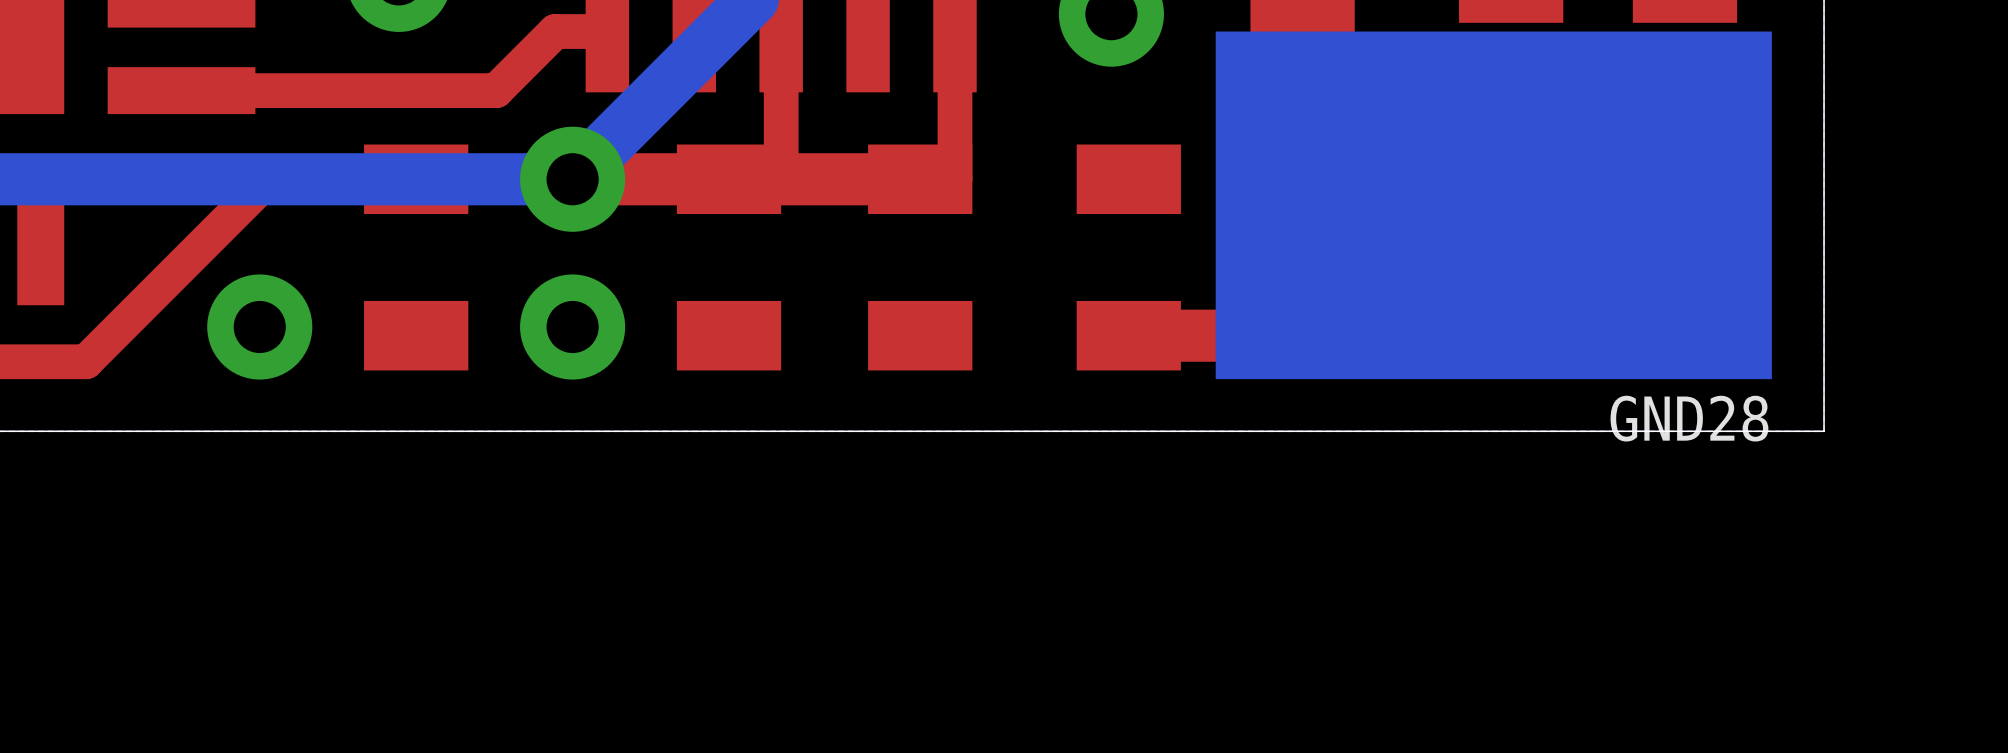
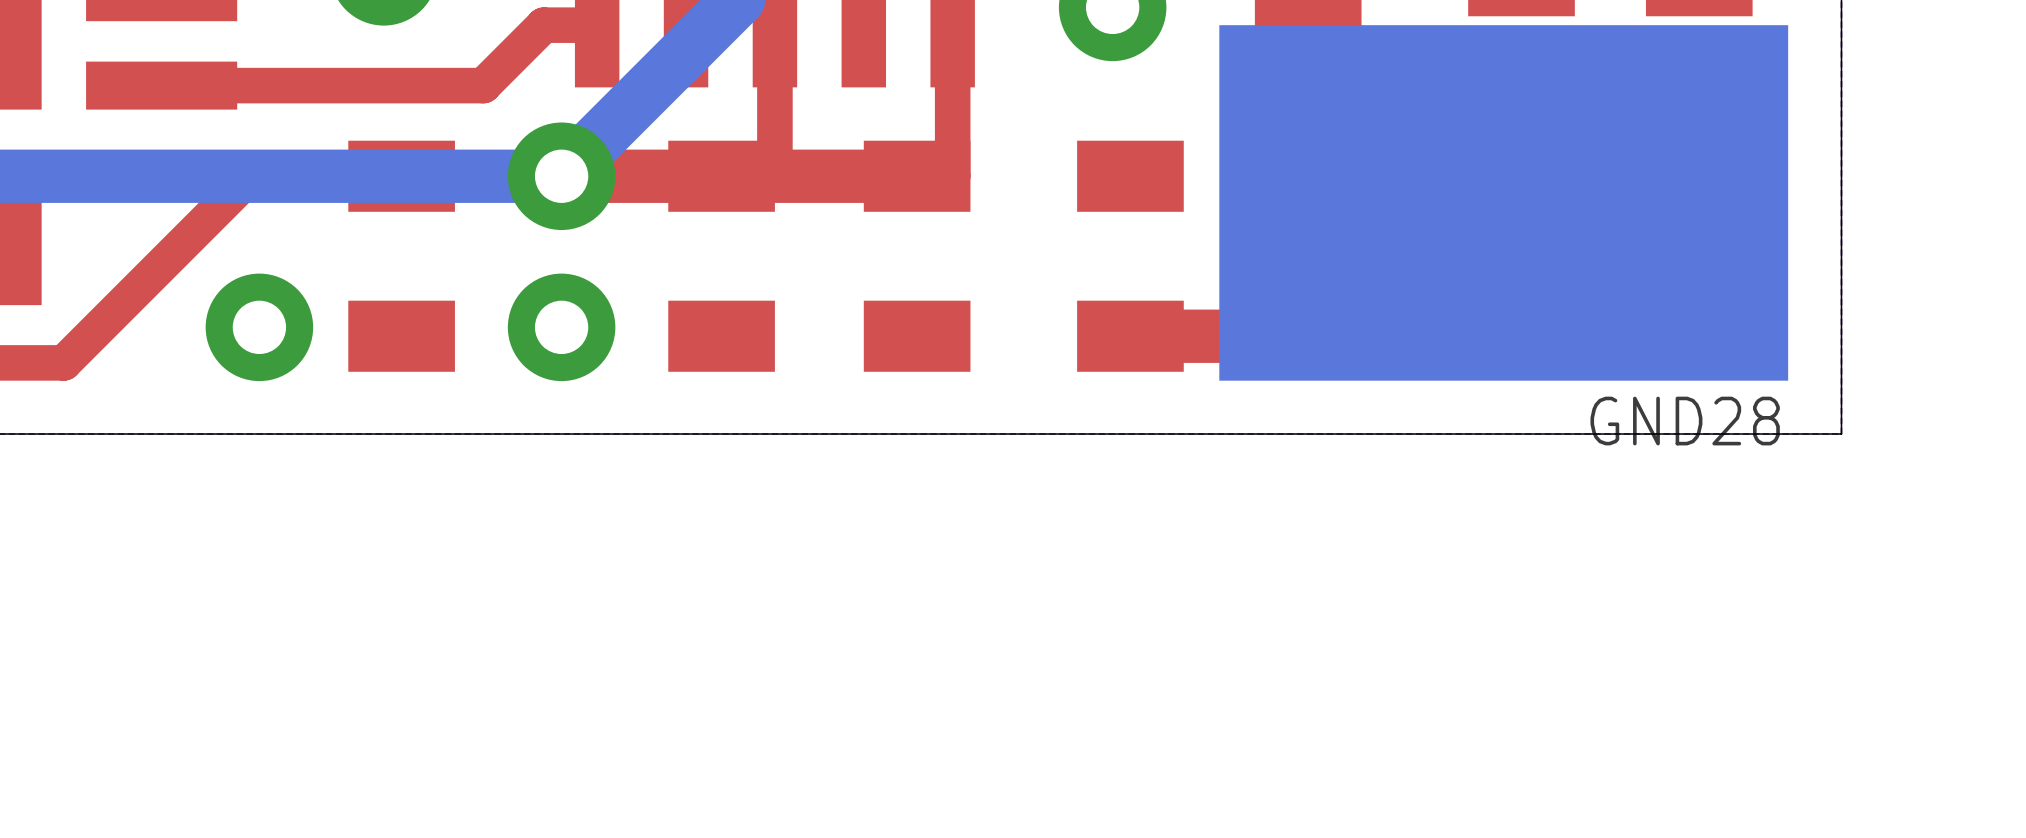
via position: (259, 327) -> (259, 327)

